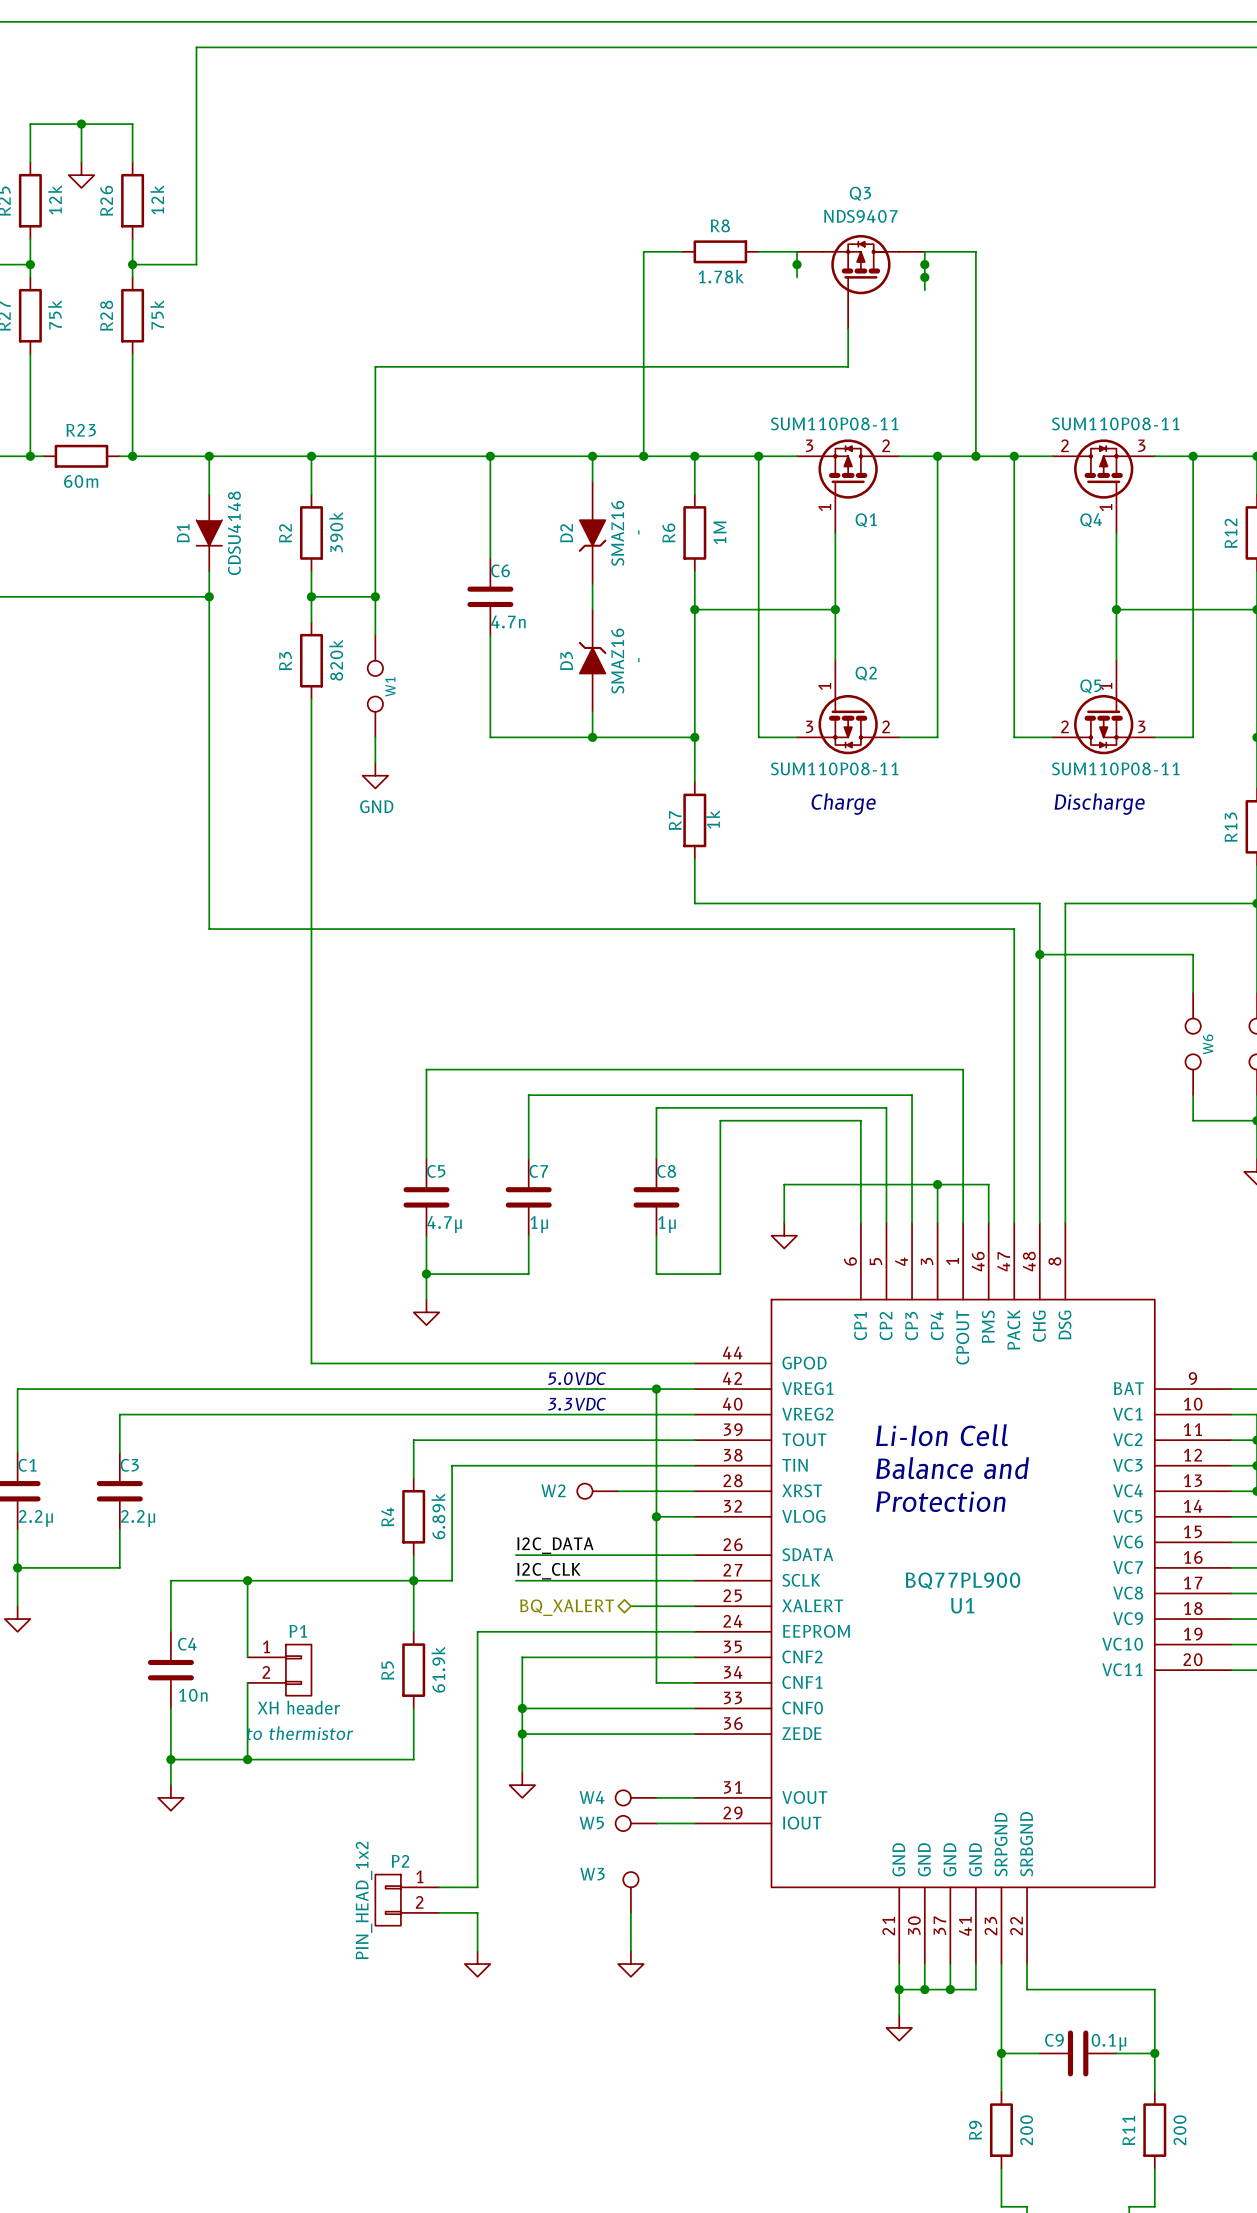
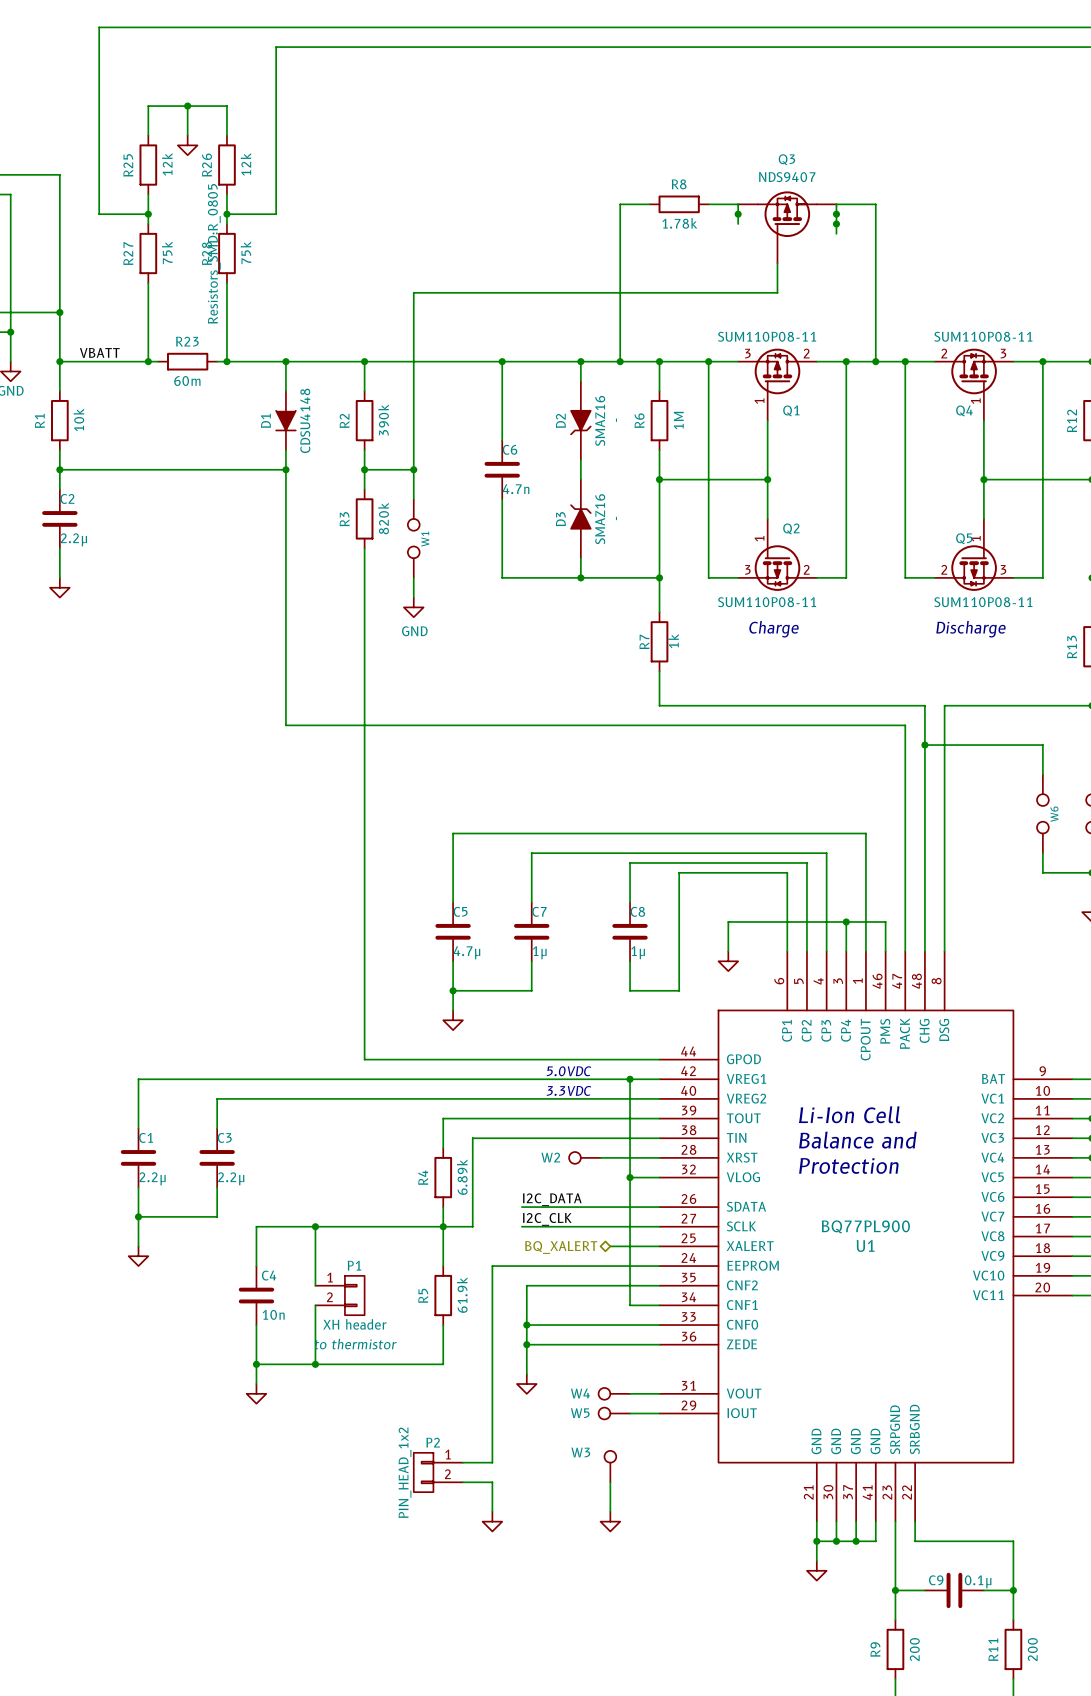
R28 text: none -> Resistors_SMD:R_0805 (214, 253)

